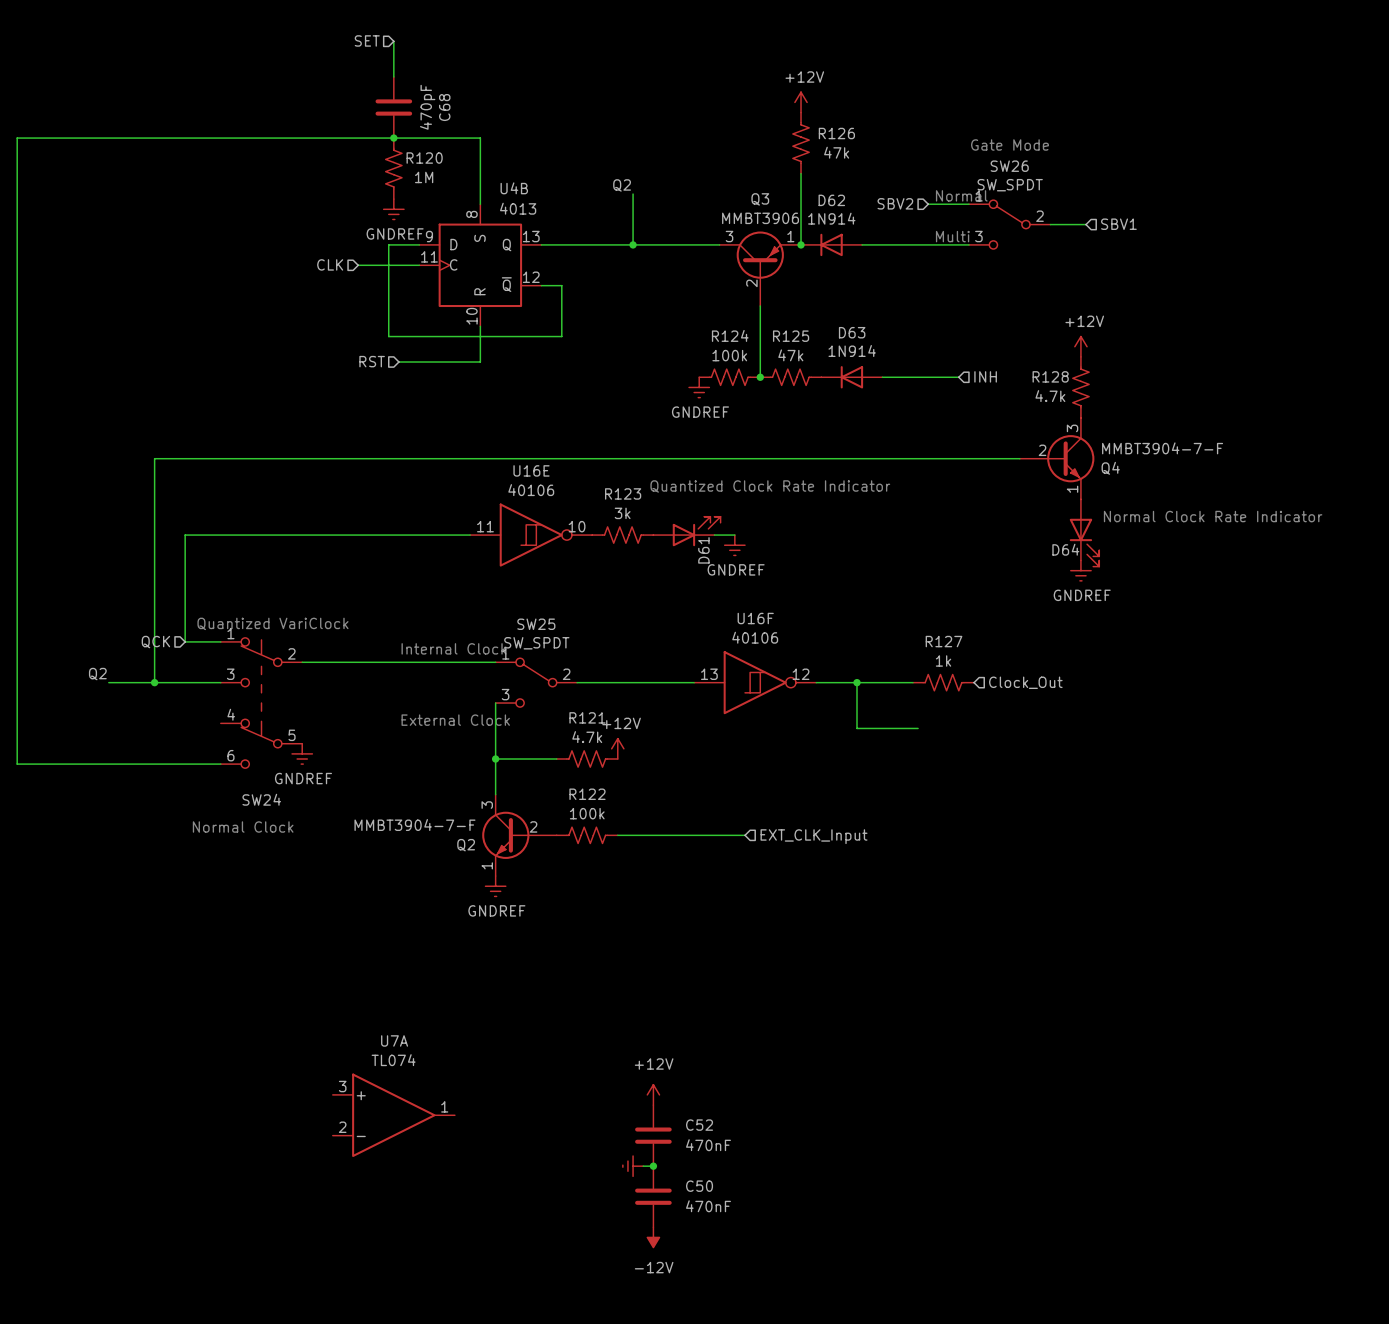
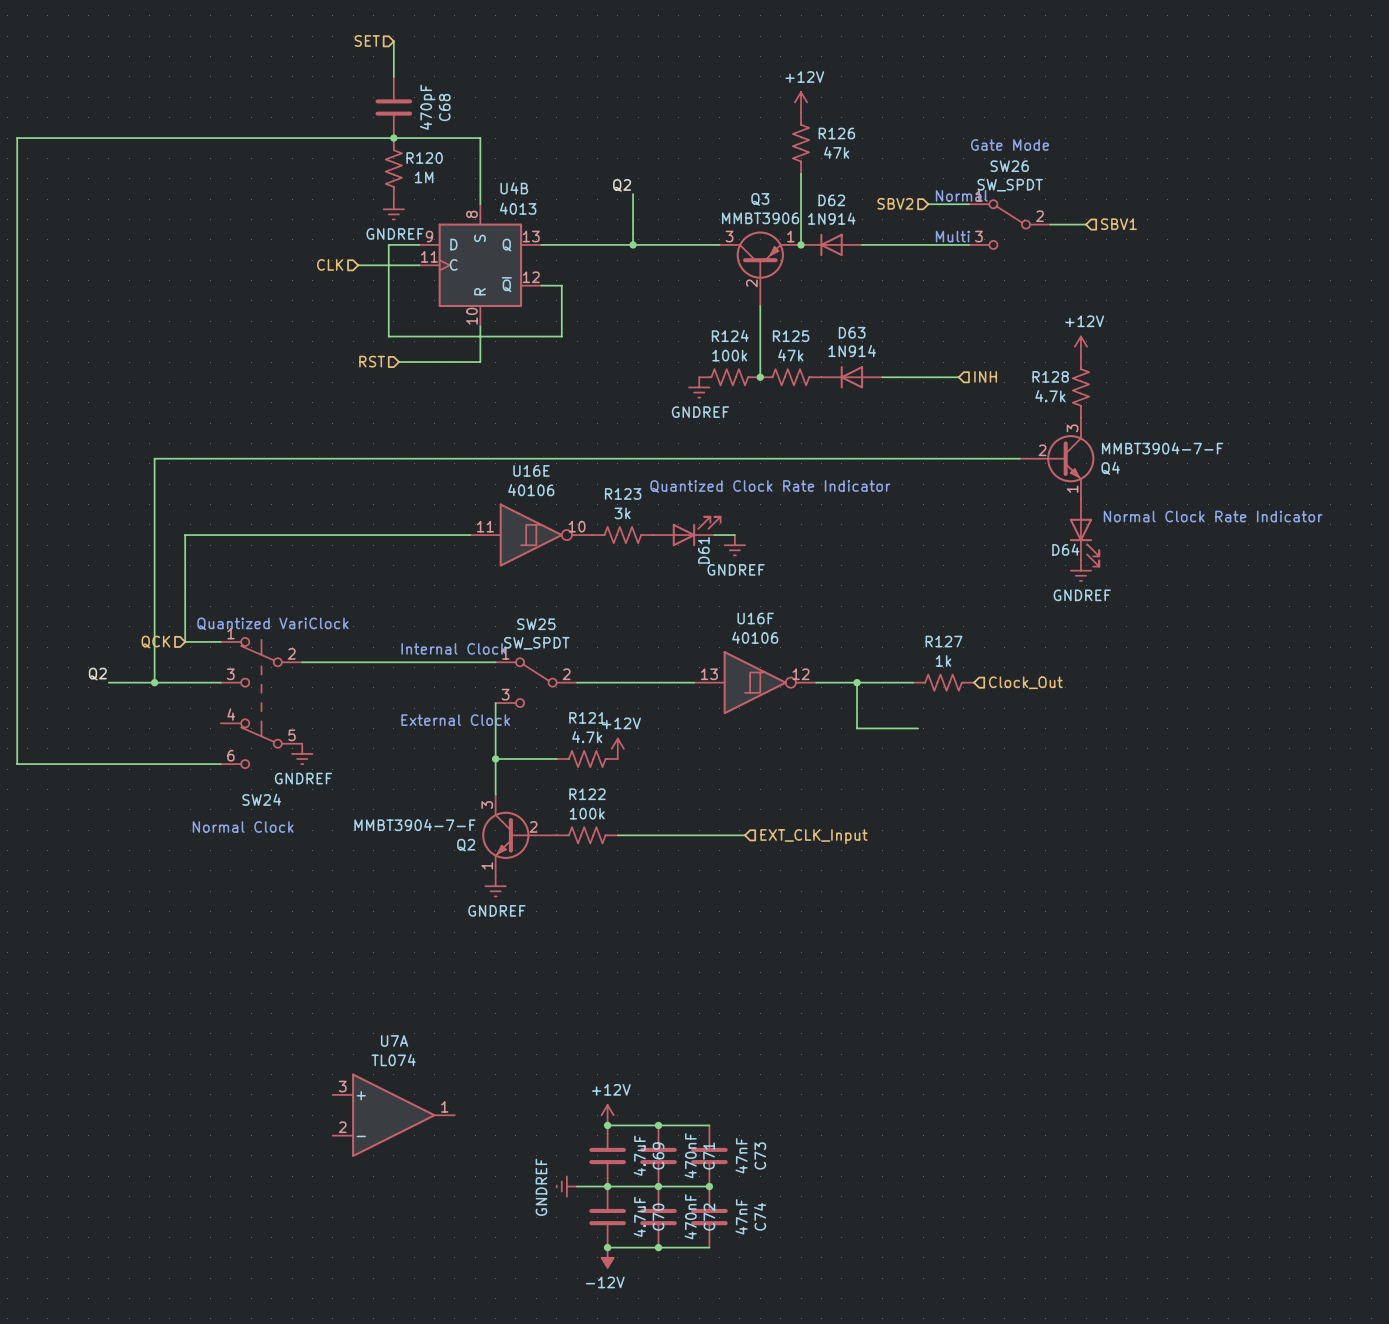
power symbol text position: +12V (654, 1064) -> +12V (611, 1089)
power symbol position: +12V (653, 1094) -> +12V (607, 1115)
wire: none -> (607, 1125) (709, 1125)
junction: none -> (607, 1125)
junction: none -> (658, 1125)
C52: 470nF (653, 1135) -> none
C69: none -> 4.7uF (607, 1155)
C71: none -> 470nF (658, 1155)
C73: none -> 47nF (709, 1155)
power symbol: (633, 1166) -> none
wire: (643, 1166) (653, 1166) -> none
junction: (653, 1166) -> none
power symbol: none -> GNDREF (566, 1186)
wire: none -> (577, 1186) (709, 1186)
junction: none -> (607, 1186)
junction: none -> (658, 1186)
junction: none -> (709, 1186)
C50: 470nF (653, 1196) -> none
C70: none -> 4.7uF (607, 1217)
C72: none -> 470nF (658, 1217)
C74: none -> 47nF (709, 1217)
power symbol position: -12V (653, 1237) -> -12V (607, 1257)
wire: none -> (607, 1247) (709, 1247)
junction: none -> (607, 1247)
junction: none -> (658, 1247)
power symbol text position: -12V (654, 1267) -> -12V (605, 1282)

